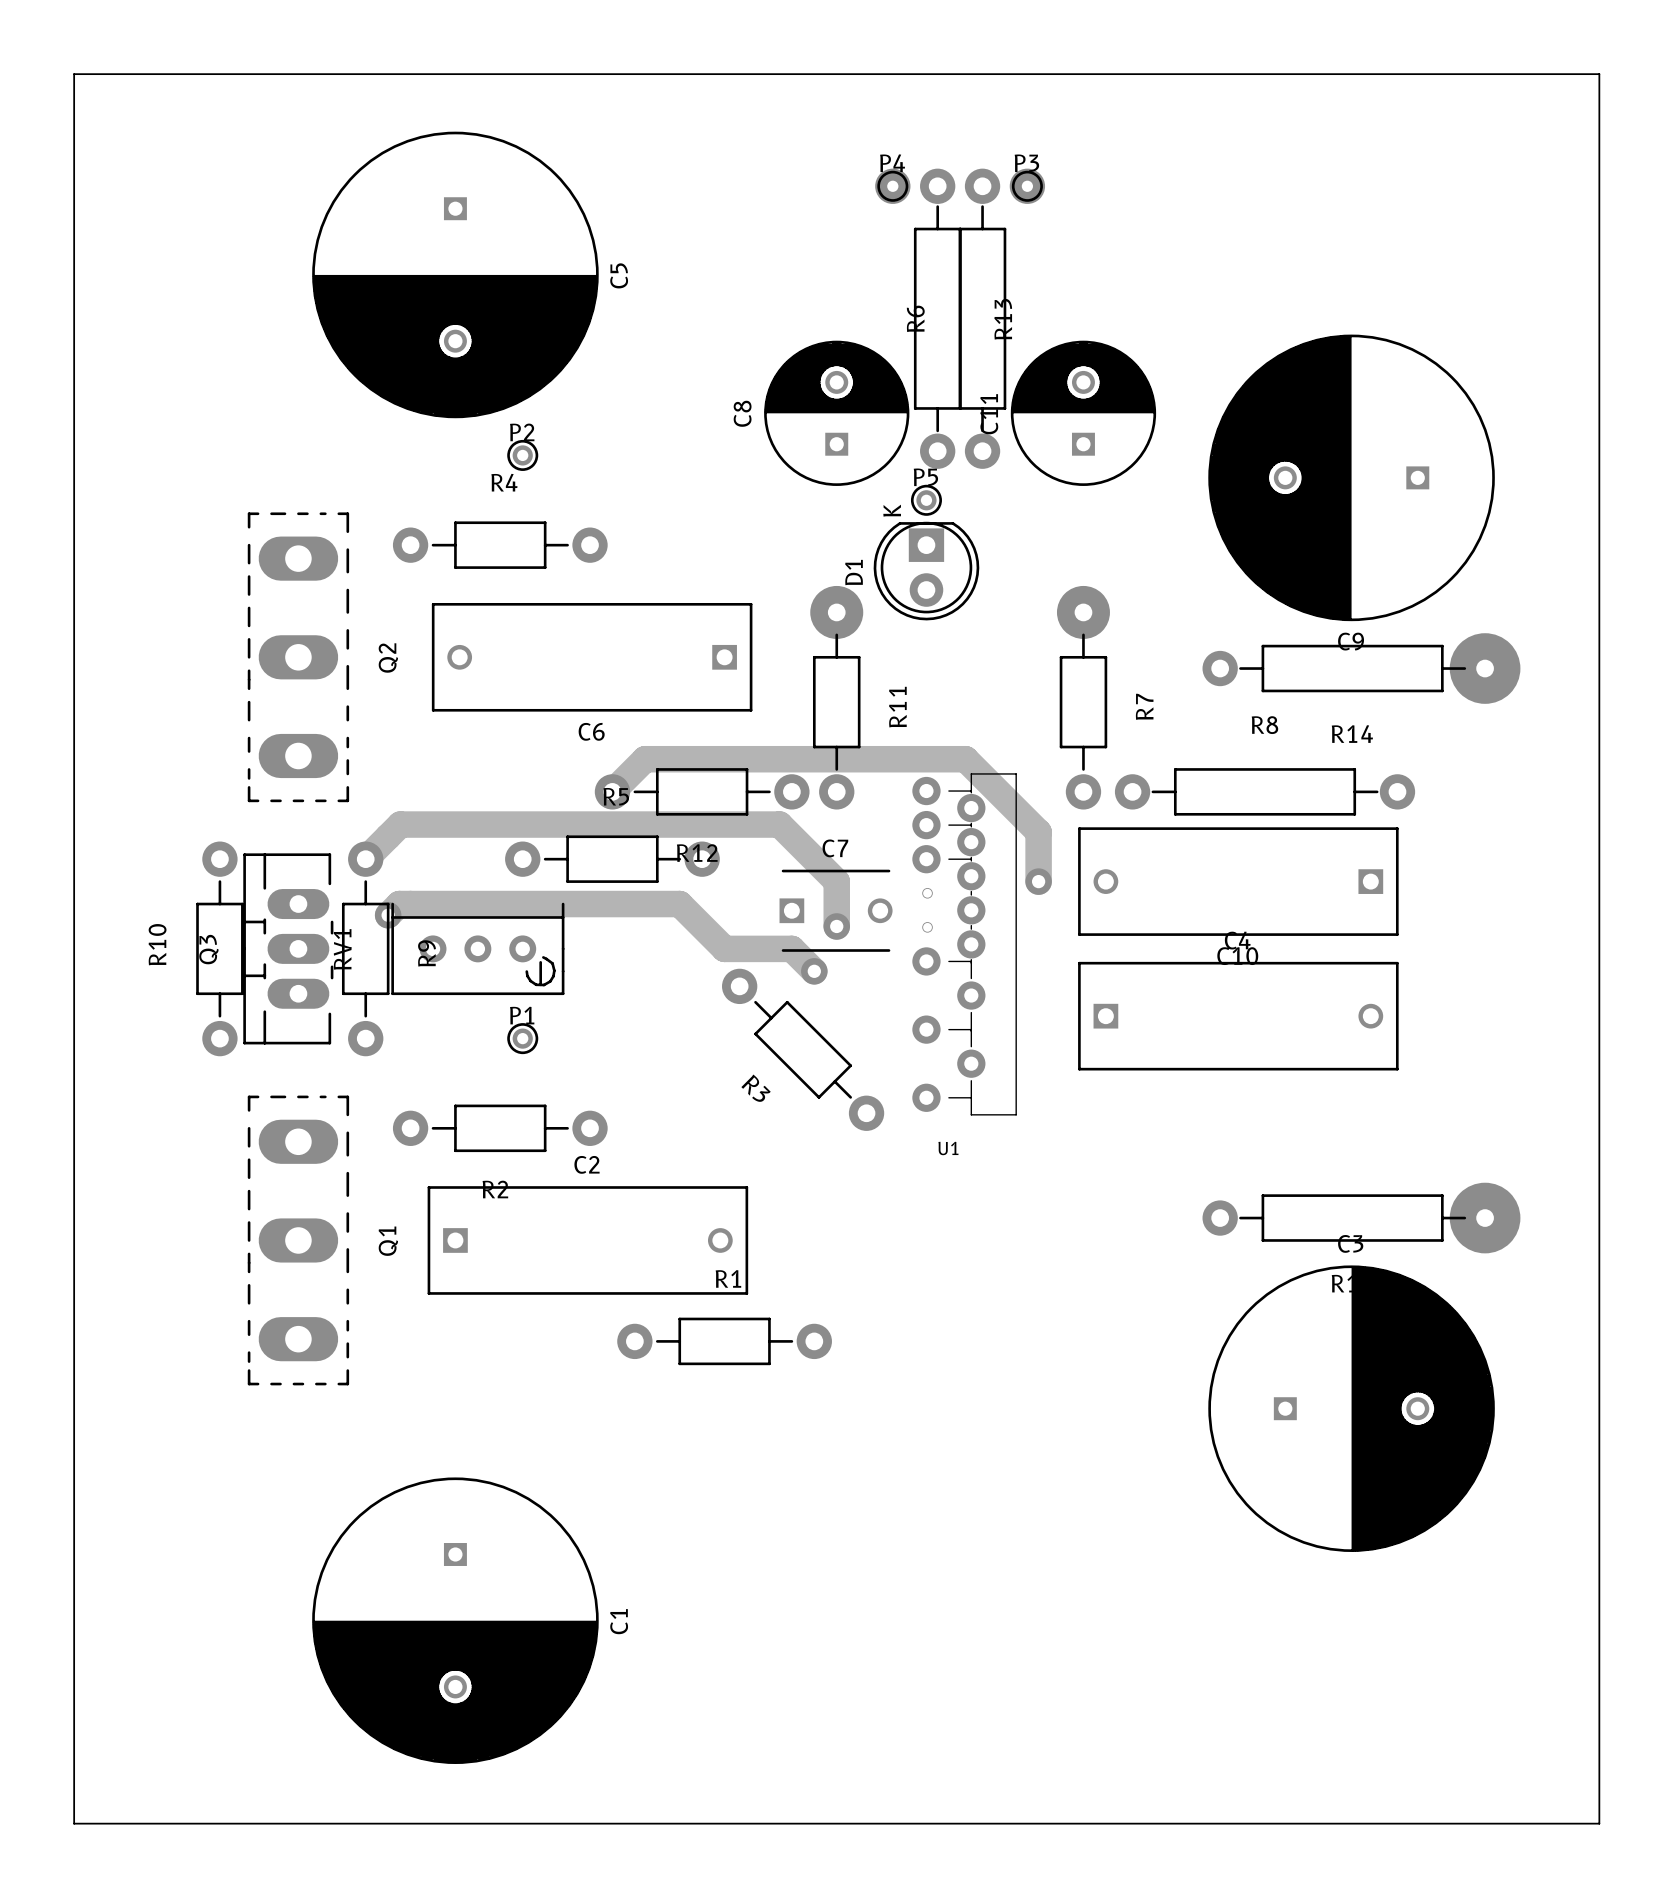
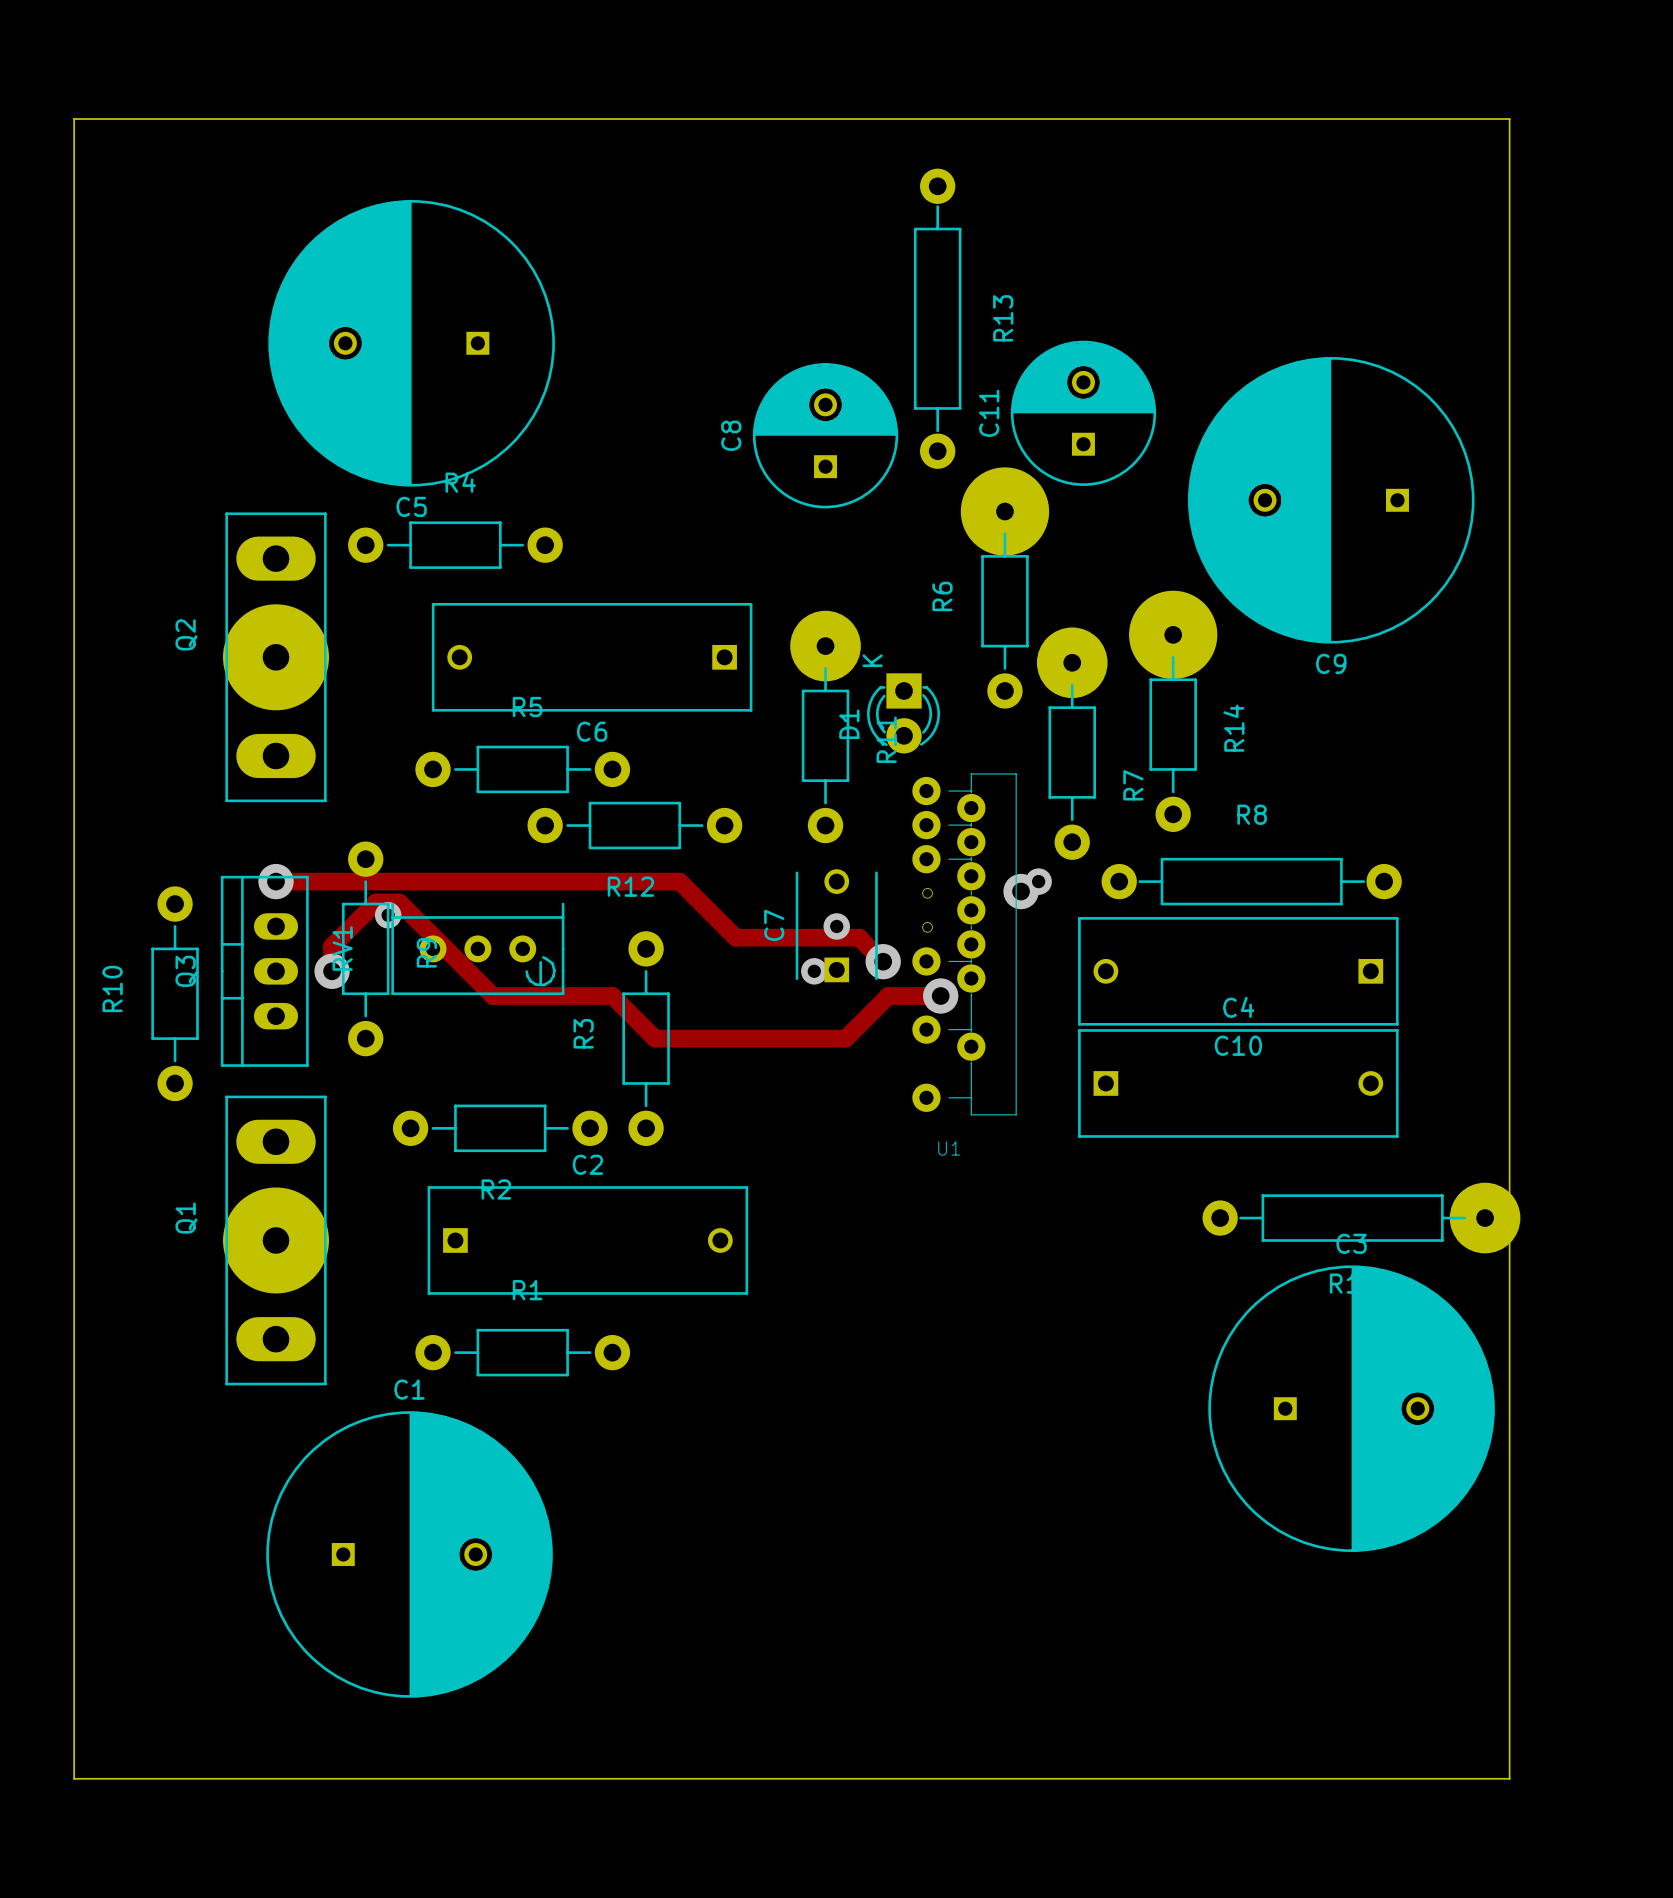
board edge: (74, 119) (74, 74) (1599, 74) (1599, 1823) (74, 1823) (74, 1778) -> (74, 119) (1509, 119) (1509, 1778) (74, 1778)
R6 footprint: [958, 168, 1007, 469] -> [960, 467, 1050, 709]
P4: (892, 186) -> none
P3: (1027, 186) -> none
C5 rotation: 0° (455, 274) -> 90° clockwise (411, 343)
C8 position: (836, 413) -> (825, 435)
P2: (522, 455) -> none
C9 position: (1351, 477) -> (1331, 500)
P5: (926, 500) -> none
Q2 footprint: [247, 512, 350, 803] -> [223, 512, 329, 803]
D1 footprint: [873, 521, 980, 621] -> [867, 673, 941, 754]
R4 position: (500, 545) -> (455, 545)
R11 footprint: [810, 585, 864, 810] -> [790, 610, 861, 844]
R7 footprint: [1056, 585, 1110, 810] -> [1036, 627, 1108, 860]
R14 footprint: [1202, 633, 1521, 704] -> [1129, 590, 1218, 832]
Q2 name position: Q2 (388, 658) -> Q2 (186, 634)
R14 name position: R14 (1352, 734) -> R14 (1233, 728)
U1 footprint: [912, 773, 1017, 1116] -> [912, 773, 1017, 1116]
track: (612, 791) (645, 759) (965, 759) (1038, 832) (1038, 881) -> none
R12 position: (702, 791) -> (634, 825)
R8 position: (1265, 791) -> (1251, 881)
Q3 footprint: [243, 853, 334, 1045] -> [220, 875, 309, 1067]
track: (365, 859) (400, 824) (779, 824) (836, 881) (836, 926) -> none
R5 position: (612, 859) -> (522, 769)
track: none -> (276, 881) (679, 881) (735, 937) (859, 937) (883, 961)
via: none -> (276, 881)
C10 position: (1238, 881) -> (1238, 971)
via: none -> (1021, 891)
C7 rotation: 0° (836, 910) -> 90° counterclockwise (836, 925)
track: (388, 915) (399, 904) (679, 904) (724, 948) (791, 948) (814, 971) -> none
R10 position: (219, 948) -> (175, 993)
via: none -> (883, 961)
track: none -> (332, 971) (332, 946) (376, 902) (399, 902) (492, 995) (612, 995) (655, 1038) (845, 1038) (888, 995) (940, 995)
via: none -> (332, 971)
via: none -> (940, 995)
C4 position: (1238, 1016) -> (1238, 1083)
P1: (522, 1038) -> none
R3 rotation: 0° (803, 1049) -> 45° clockwise (646, 1038)
R3 position: (803, 1049) -> (646, 1038)
Q1 footprint: [247, 1095, 350, 1386] -> [223, 1095, 329, 1386]
Q1 name position: Q1 (388, 1241) -> Q1 (186, 1218)
R1 position: (724, 1341) -> (522, 1352)
C1 rotation: 0° (455, 1620) -> 90° counterclockwise (409, 1554)

